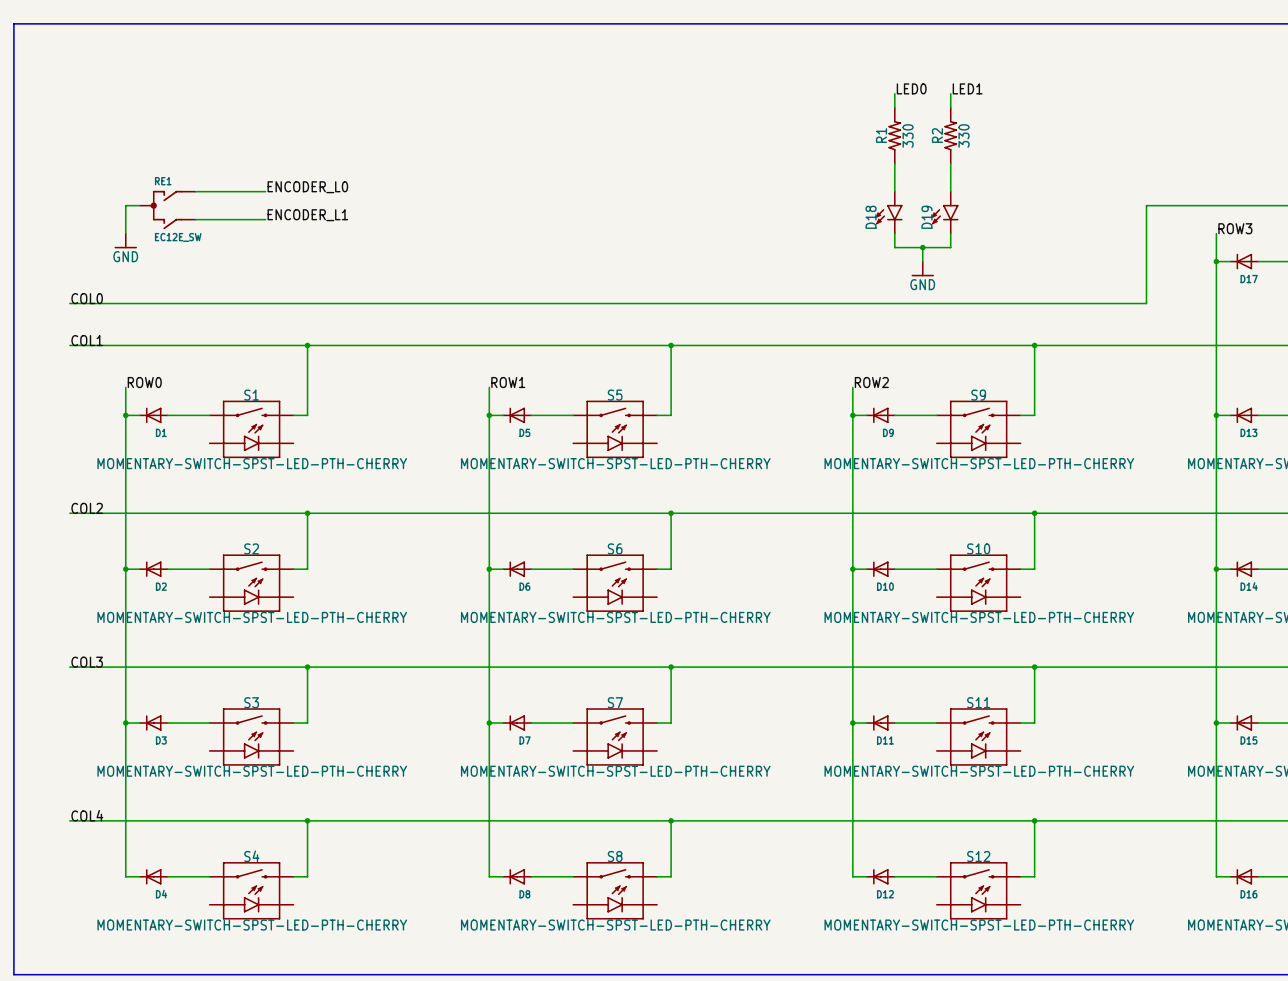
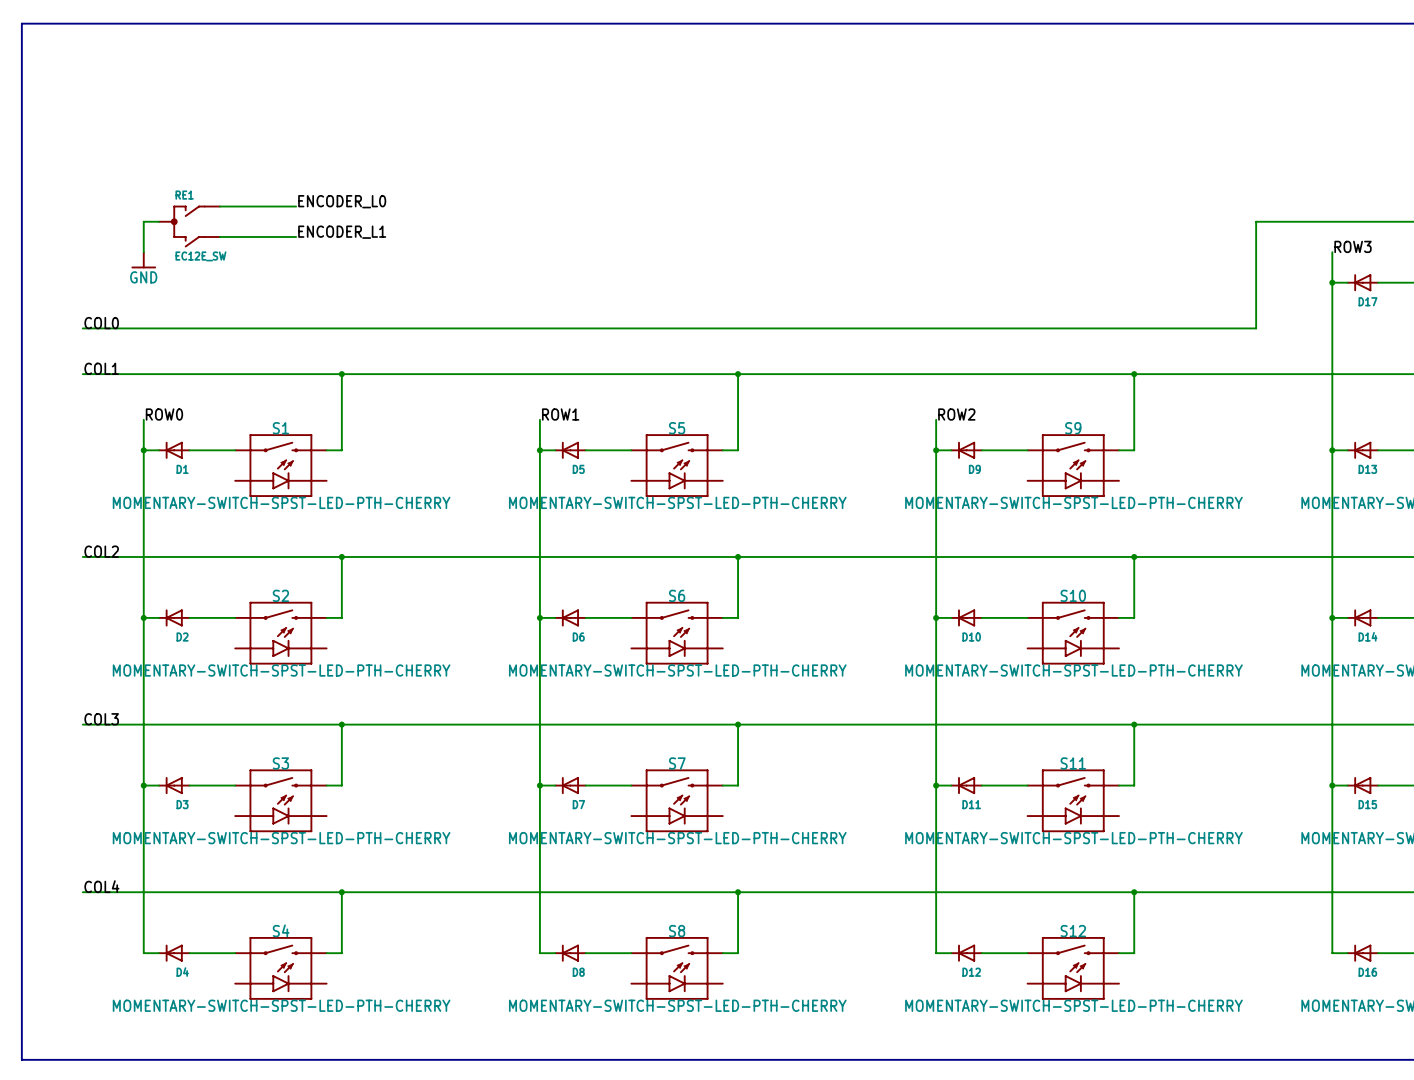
label: LED0 (911, 88) -> none
label: LED1 (967, 88) -> none
wire: (894, 93) (894, 107) -> none
wire: (950, 93) (950, 107) -> none
R1: 330 (894, 135) -> none
R2: 330 (950, 135) -> none
wire: (894, 163) (894, 191) -> none
wire: (950, 163) (950, 191) -> none
D18: (888, 212) -> none
D19: (944, 212) -> none
wire: (894, 233) (894, 247) (950, 247) (950, 233) -> none
wire: (922, 247) (922, 261) -> none
junction: (922, 247) -> none
power symbol: GND (922, 268) -> none

